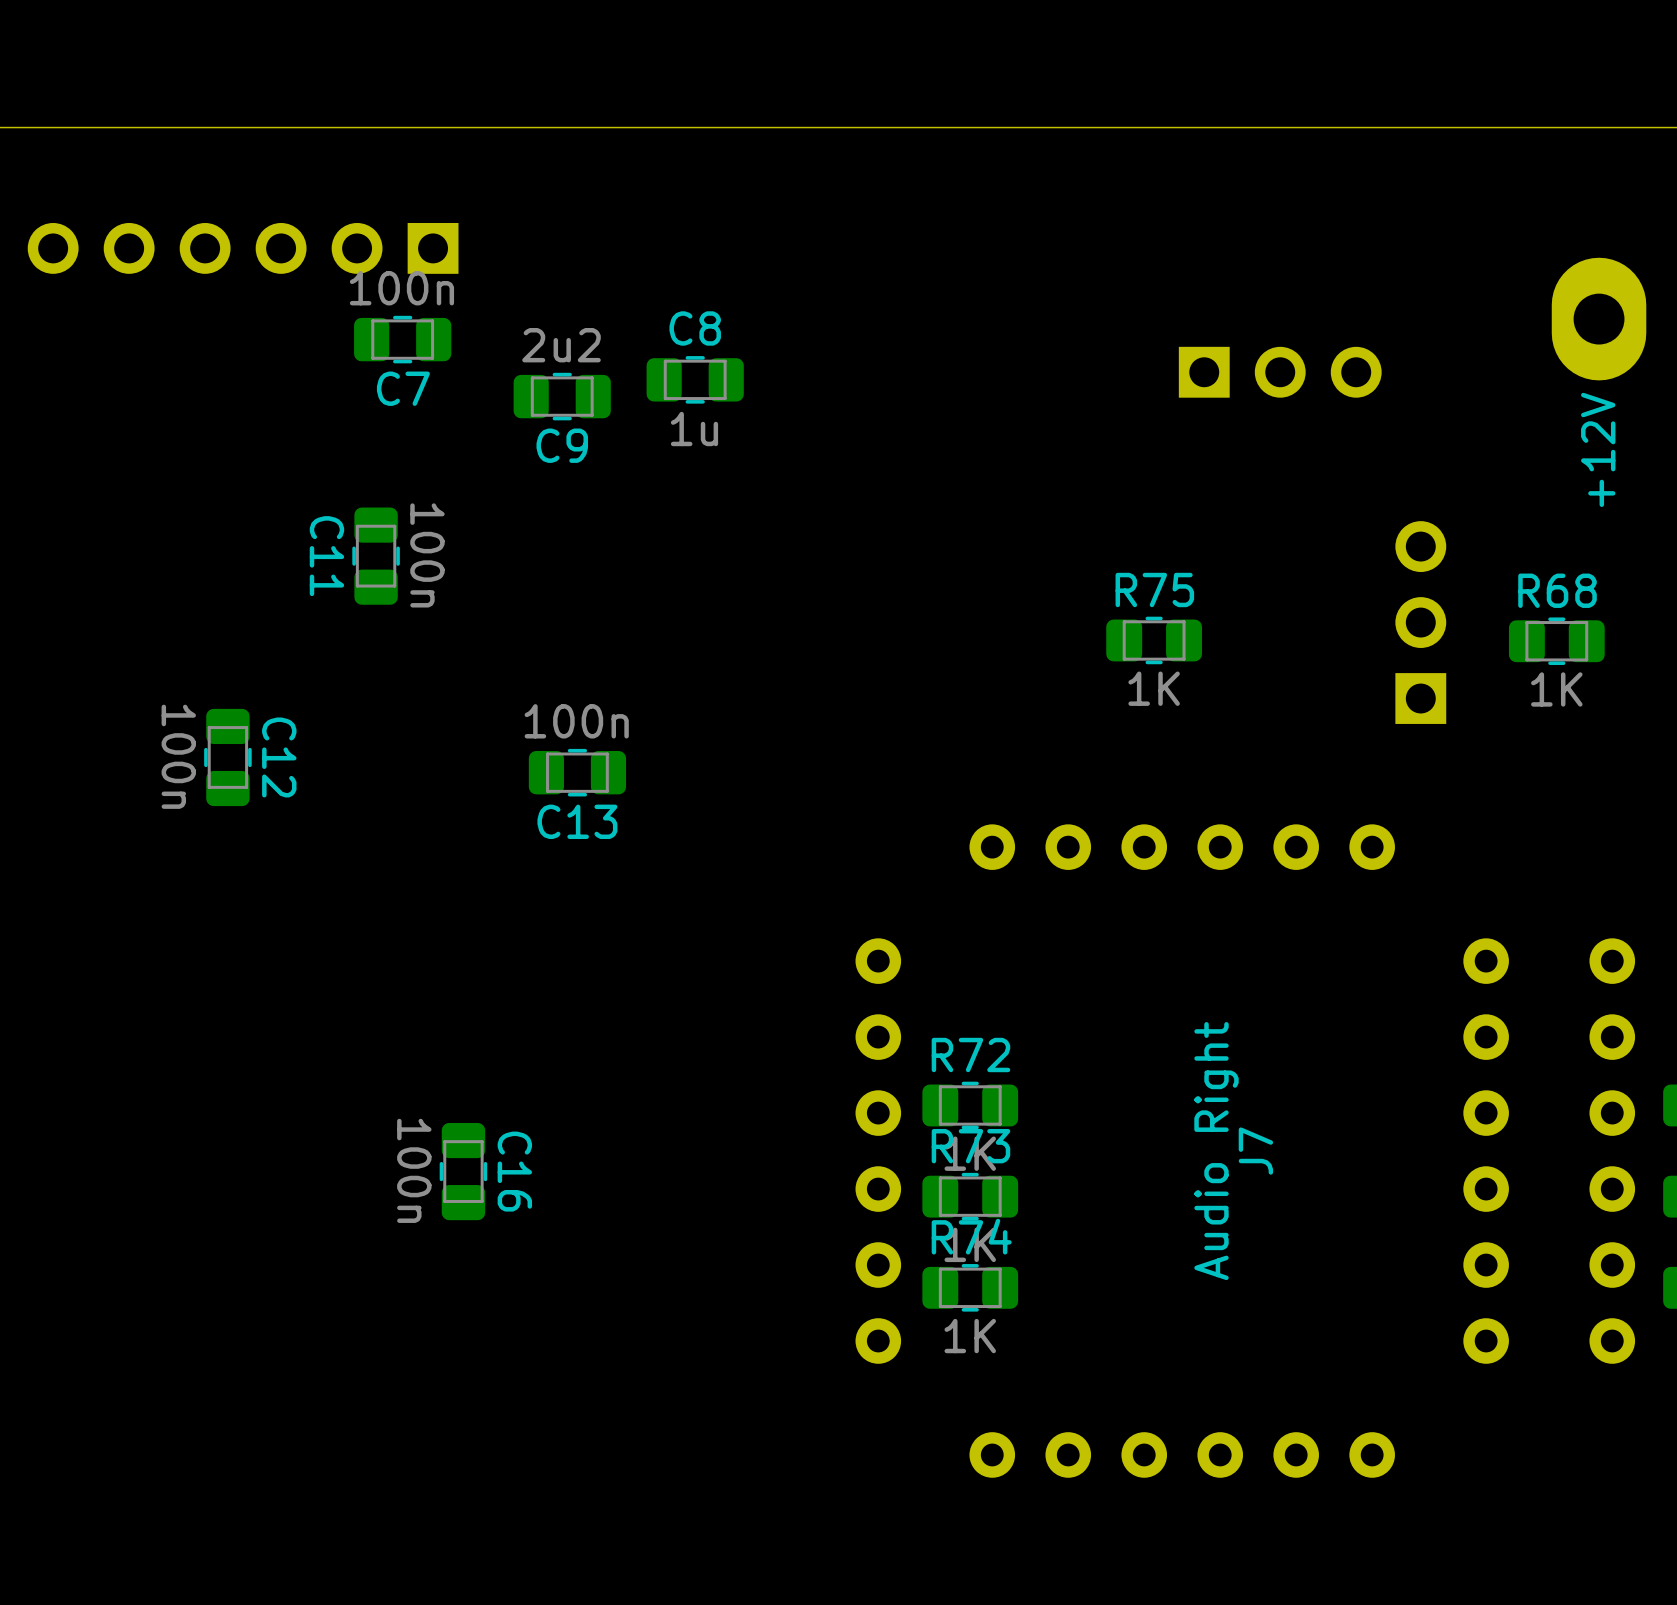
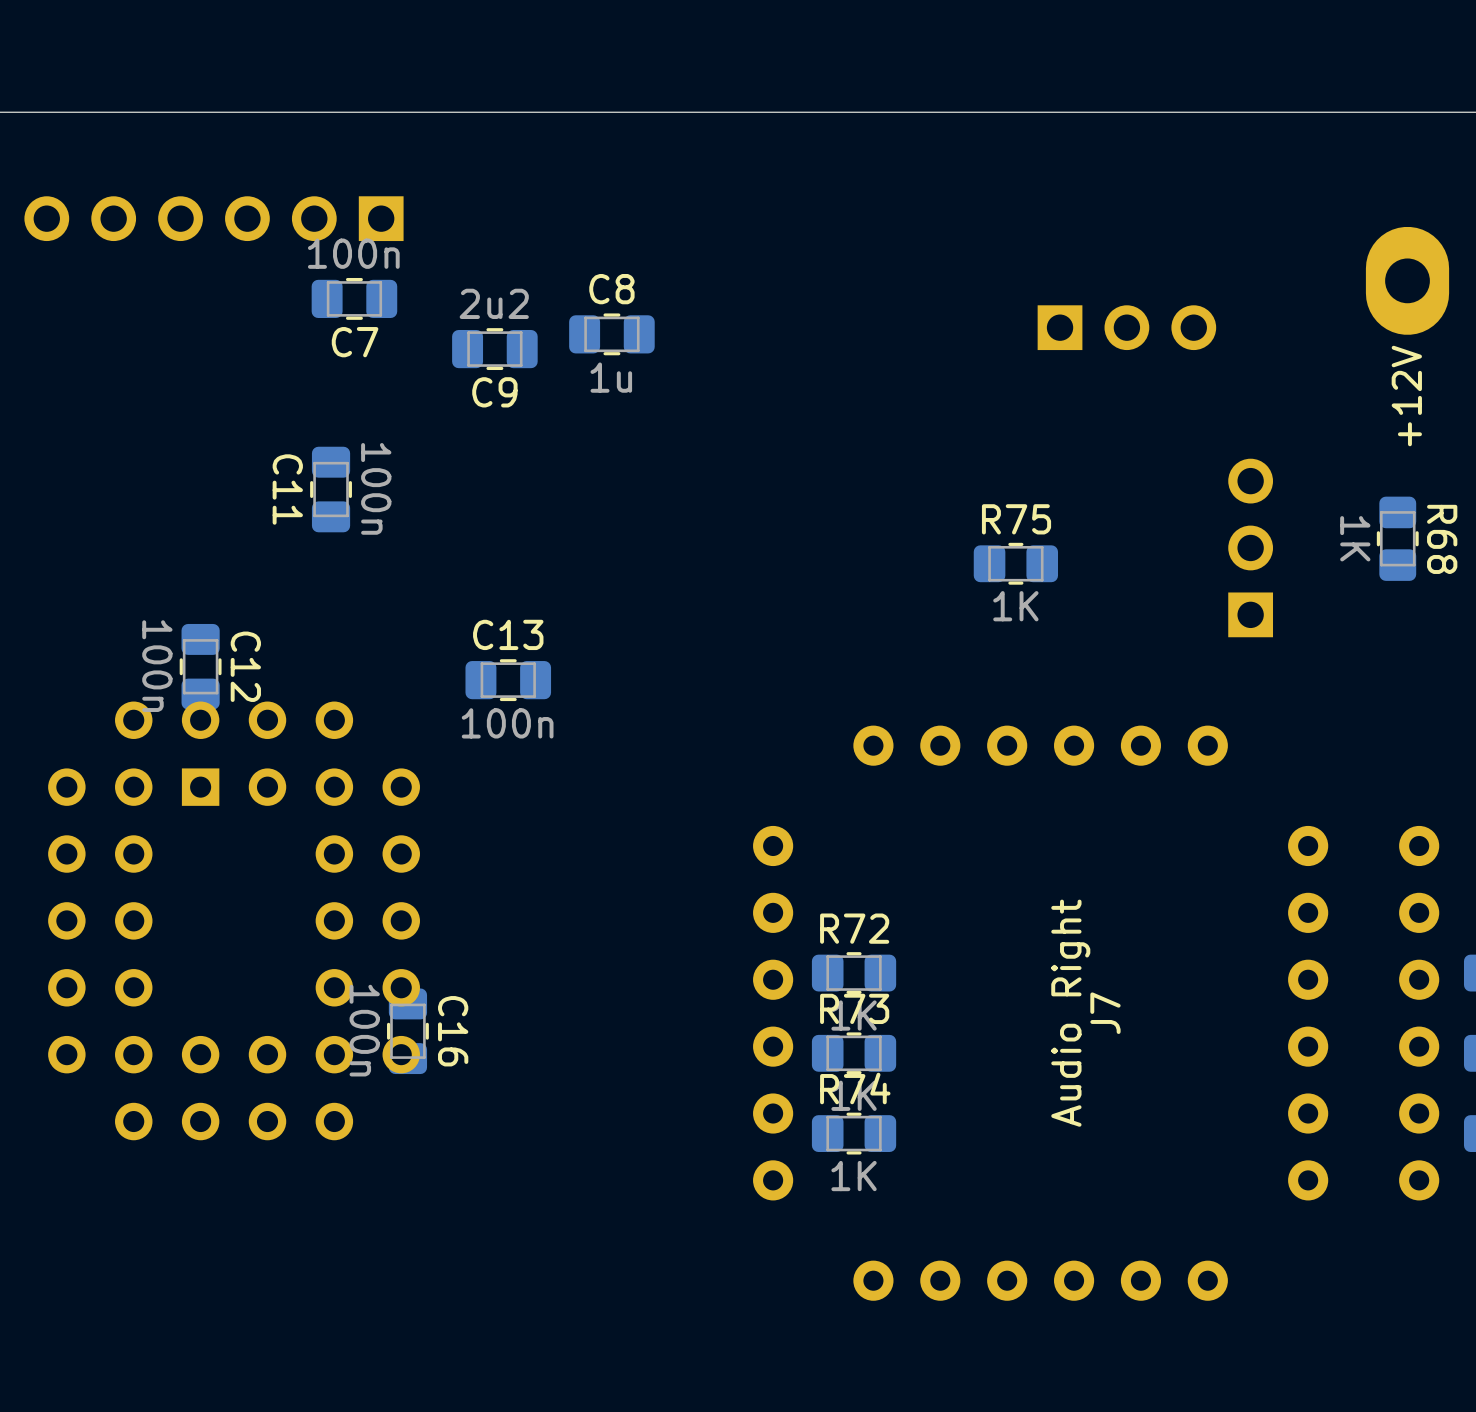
R68 rotation: 0° (1556, 641) -> 90° clockwise (1397, 538)
C13 value position: 100n (576, 721) -> 100n (507, 723)
C13 name position: C13 (577, 821) -> C13 (508, 634)
part: none -> (234, 920)

